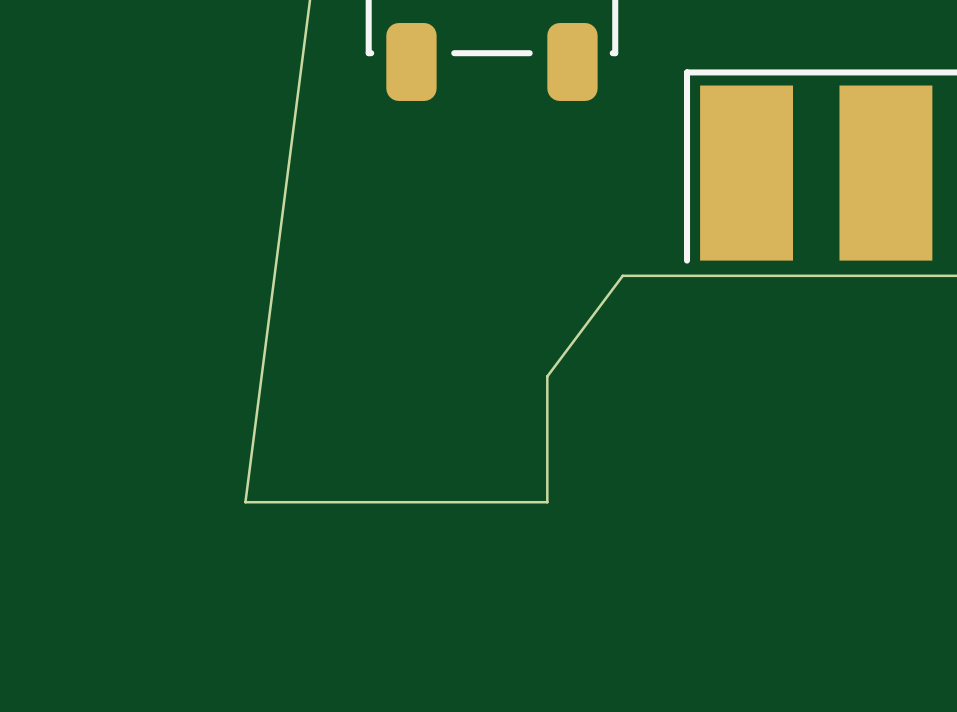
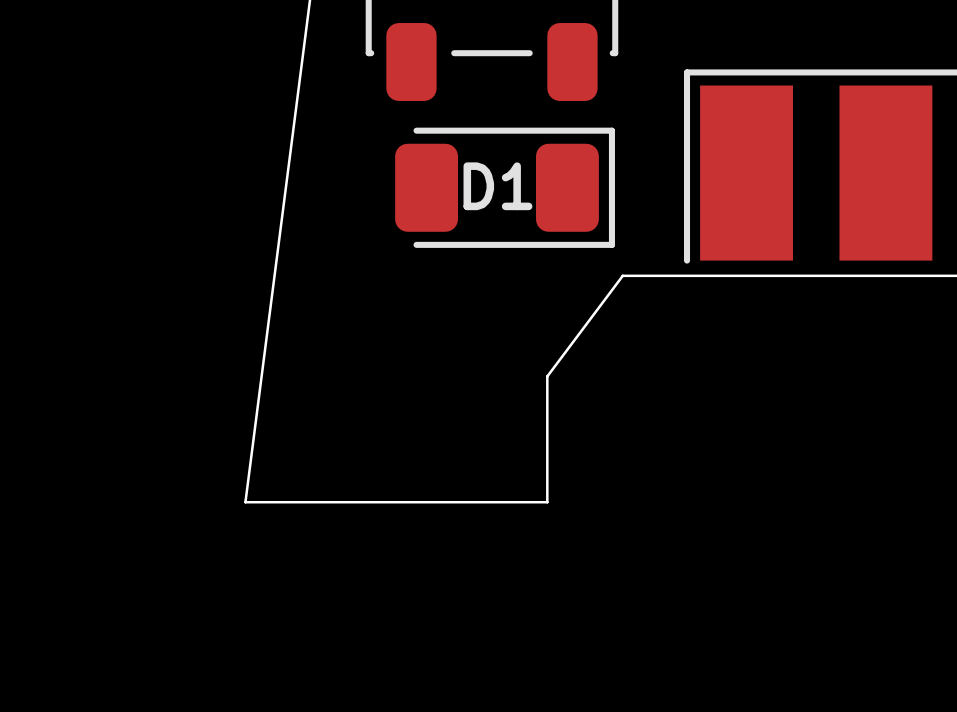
D1: none -> (505, 187)

